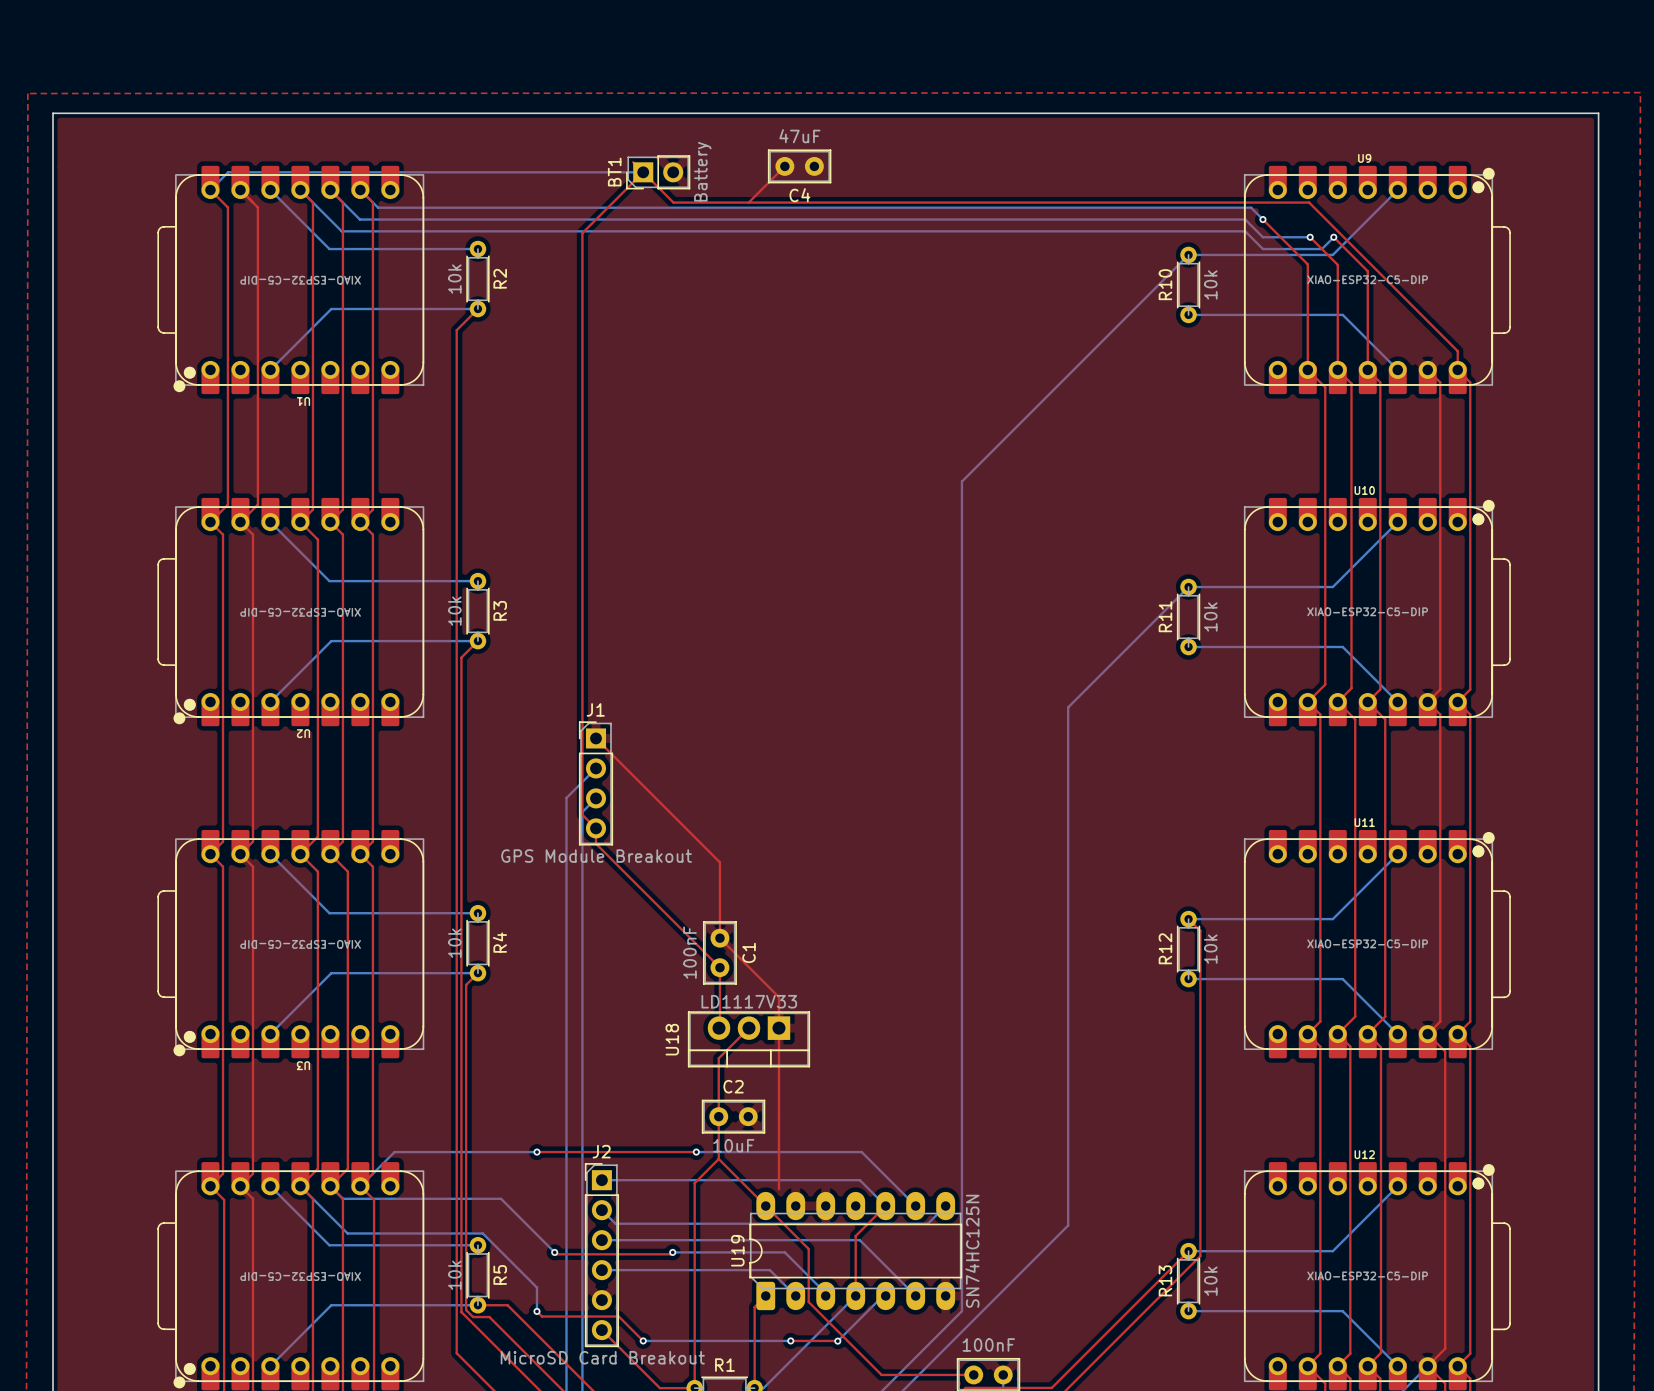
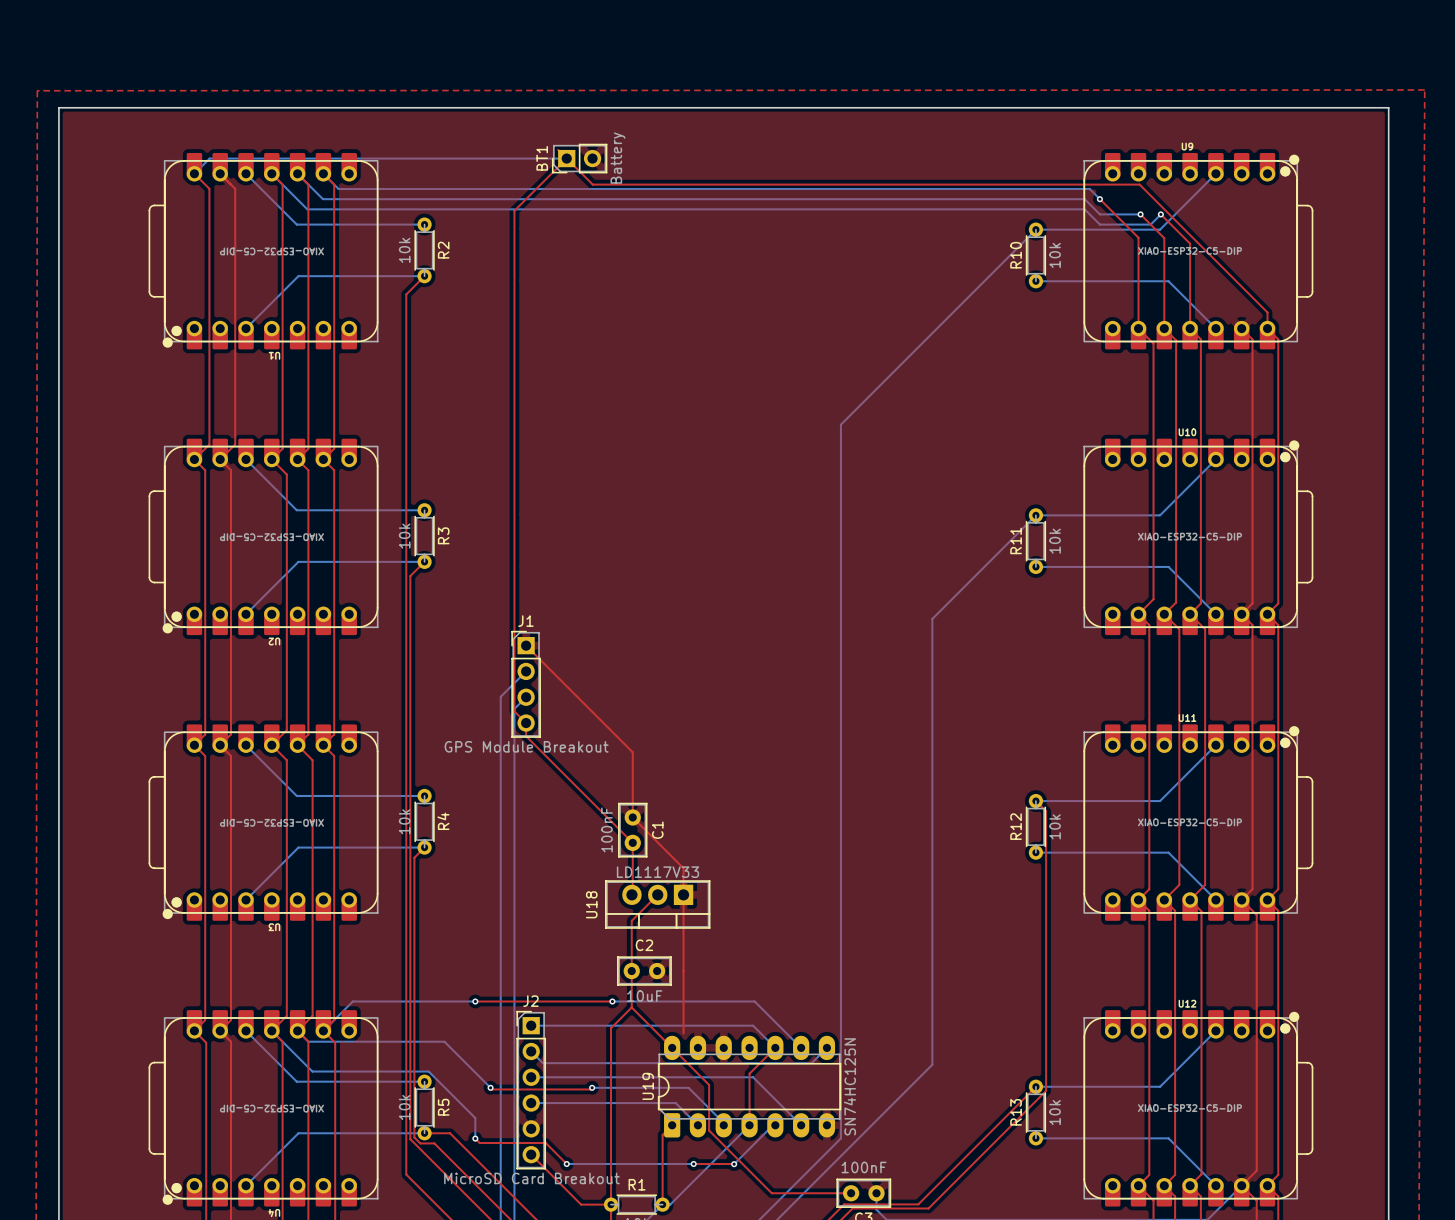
top track: (784, 166) (748, 202) -> none
C4: 47uF (799, 166) -> none

